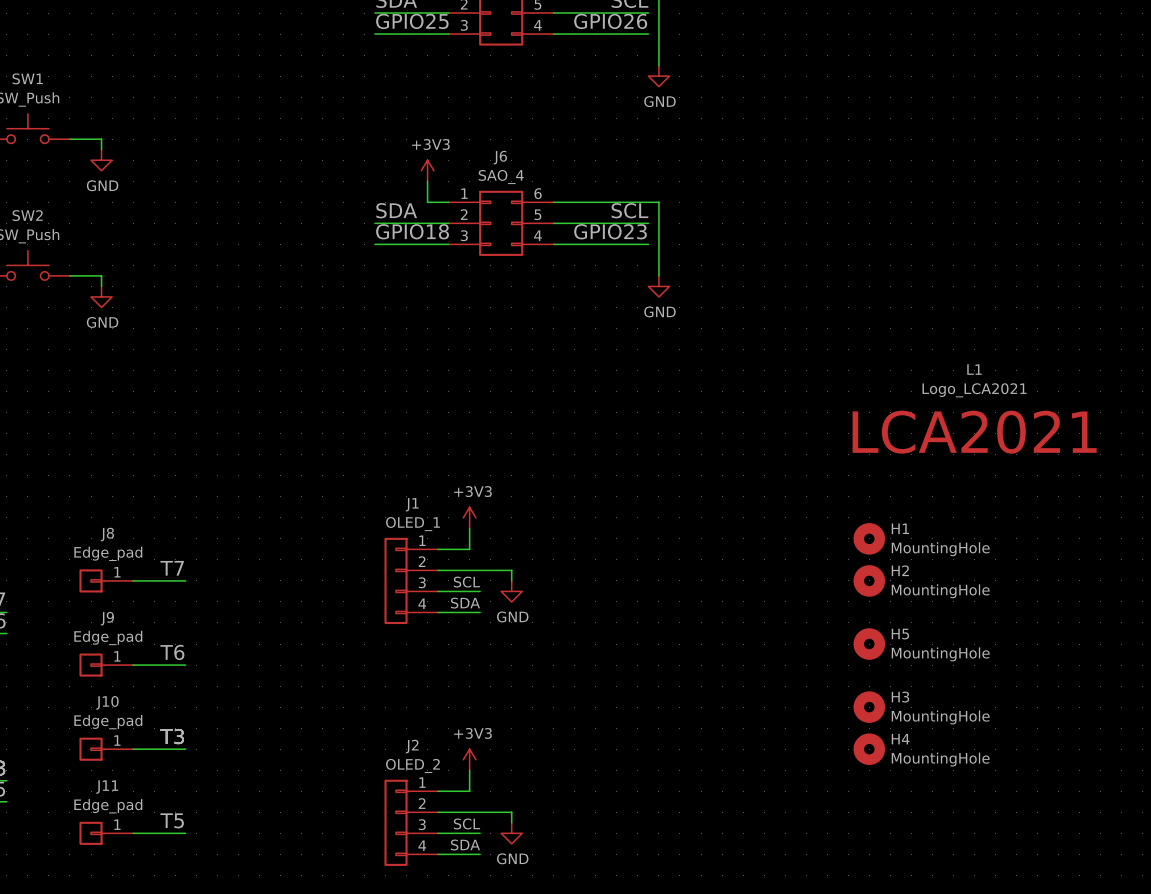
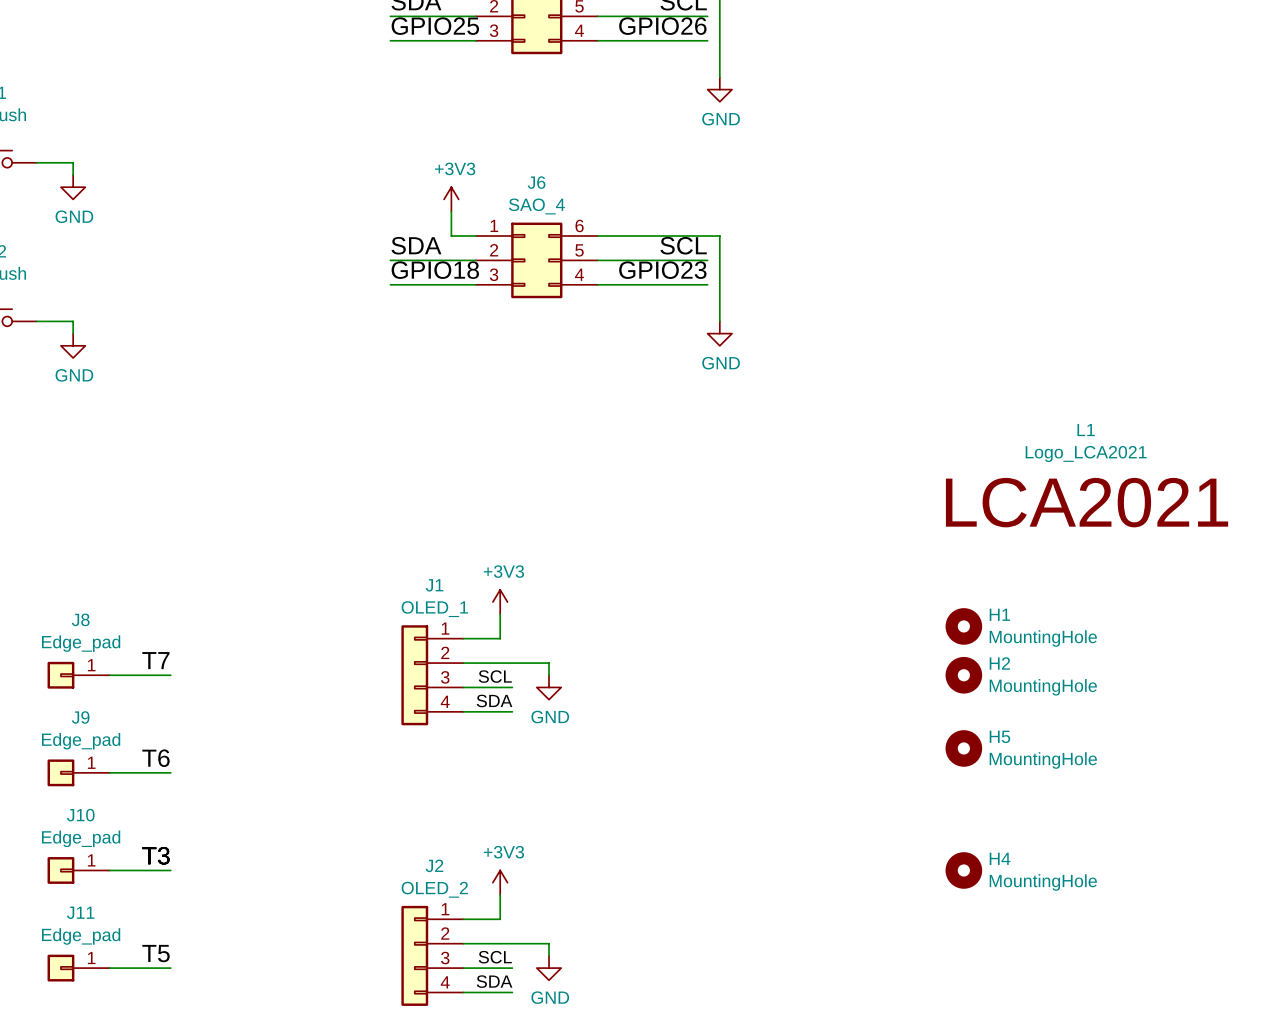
H3: MountingHole (869, 707) -> none

